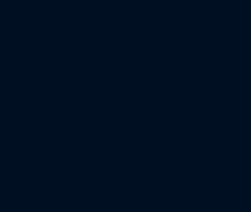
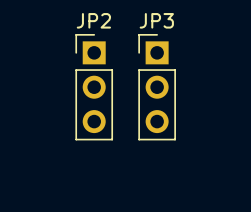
JP2: none -> (94, 87)
JP3: none -> (157, 87)

